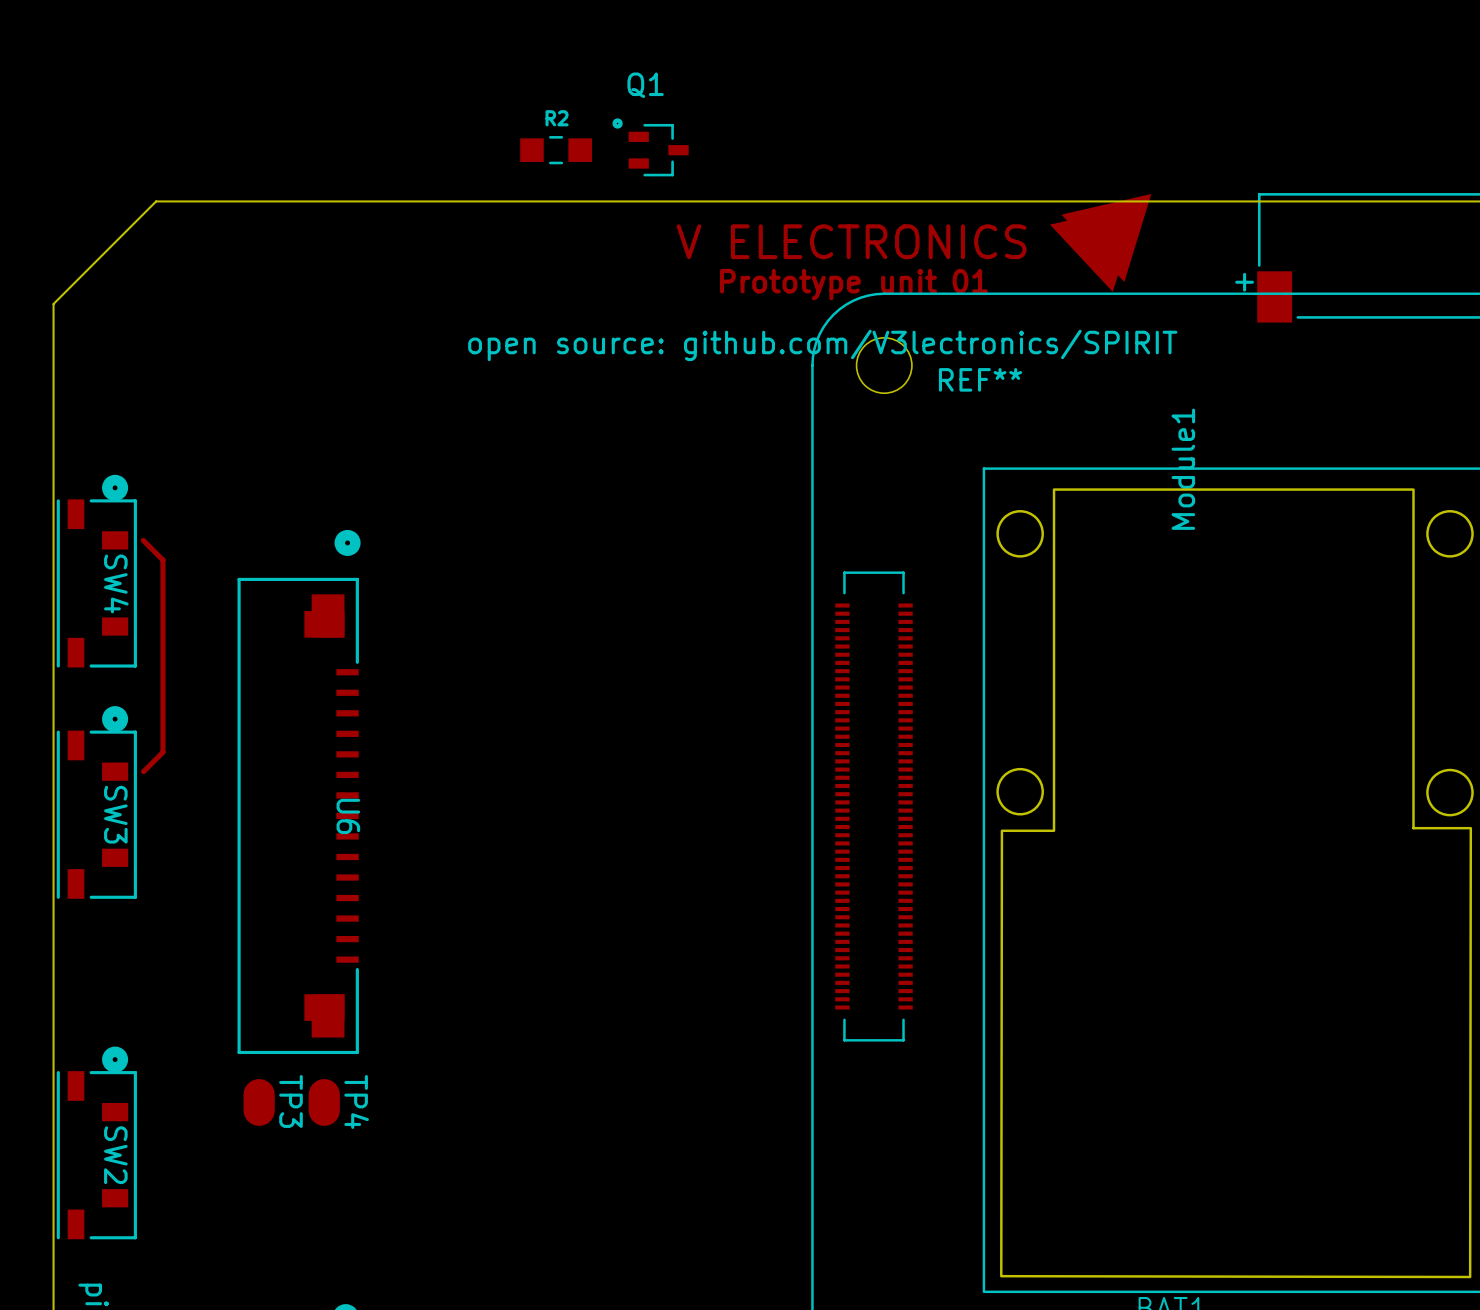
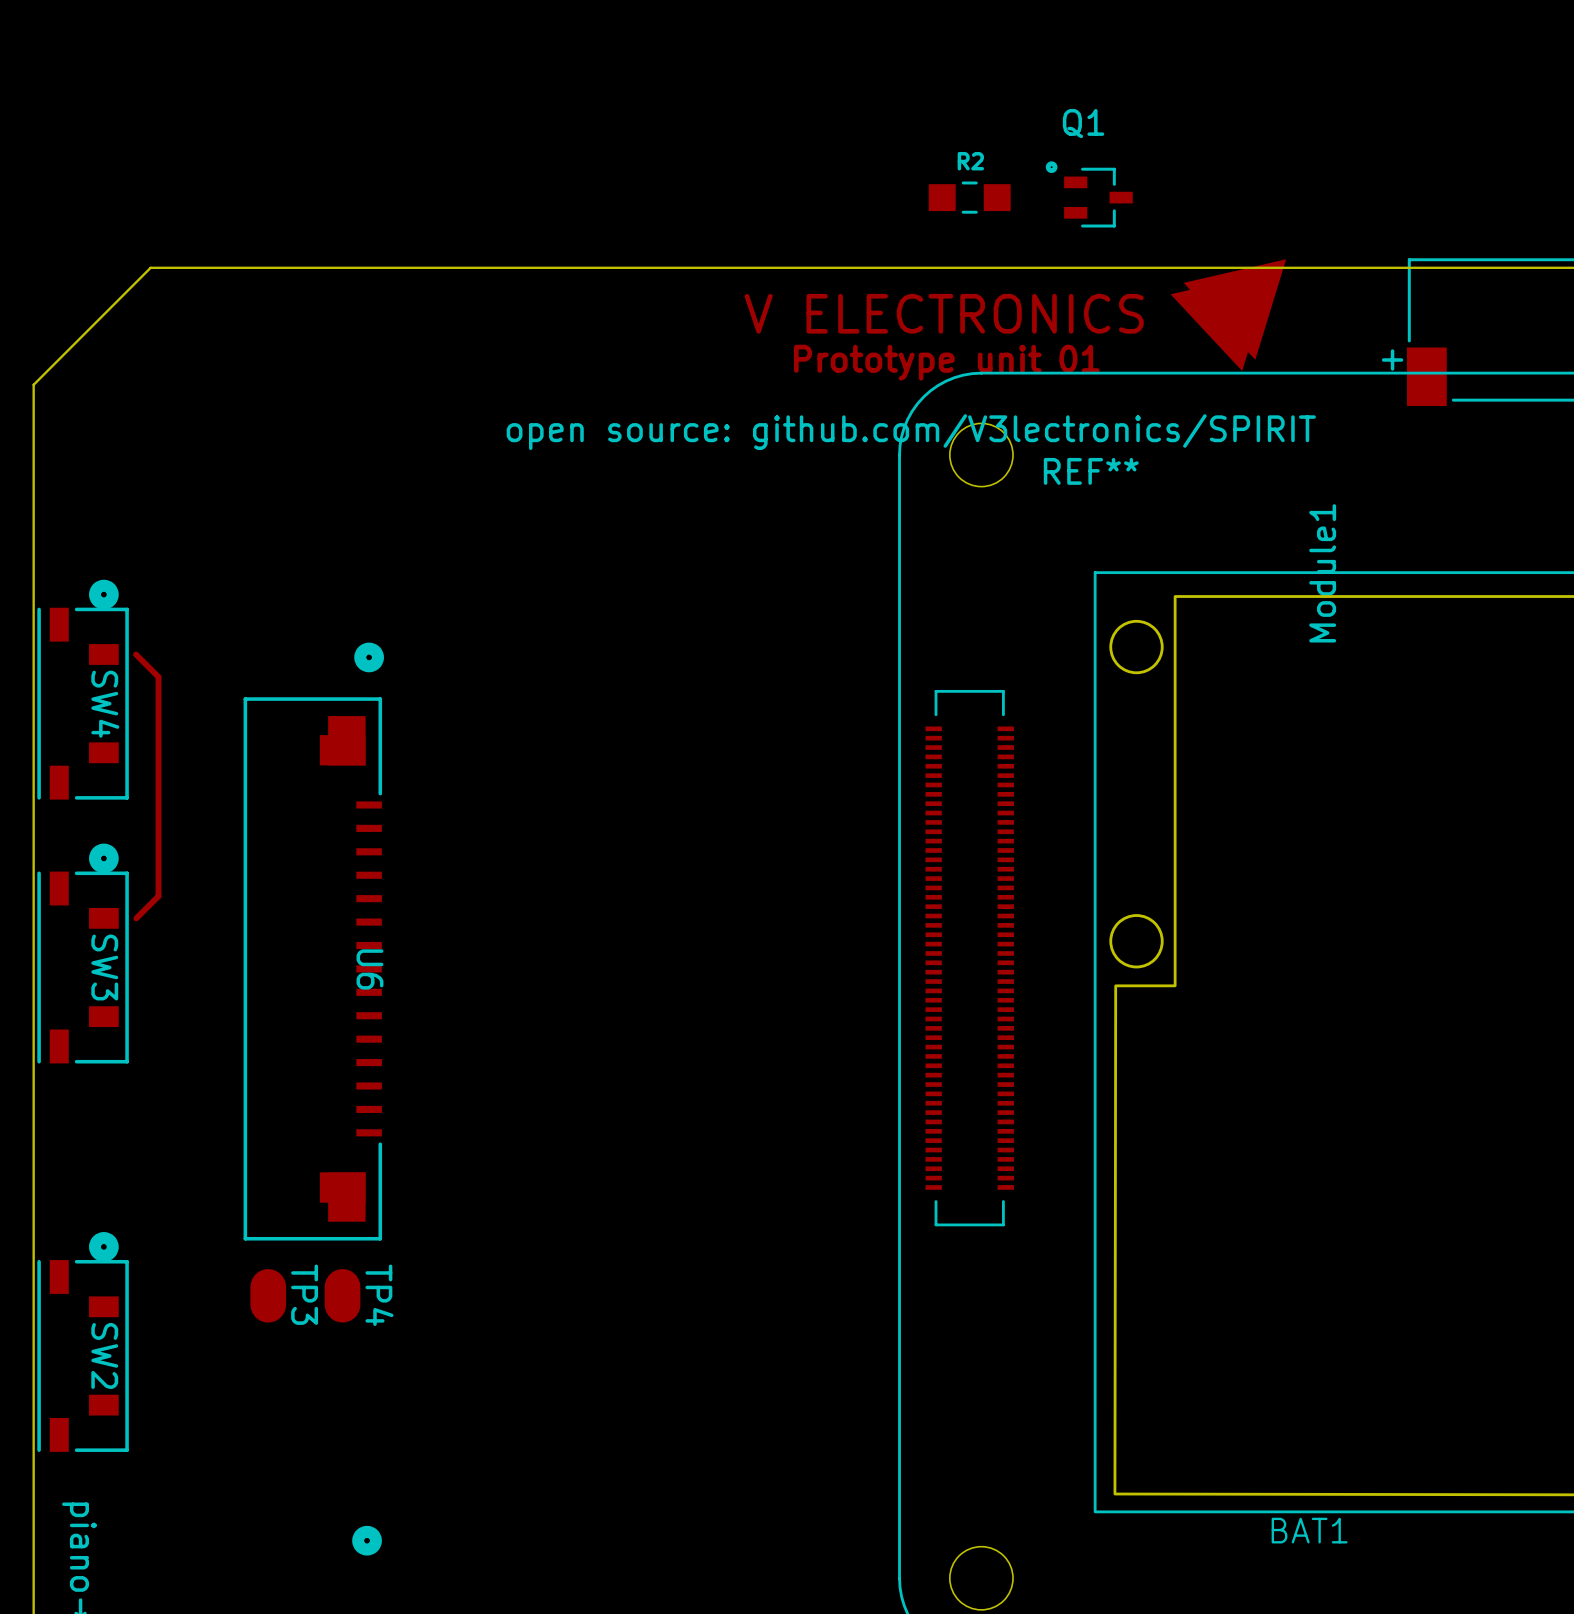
Q1 position: (650, 147) -> (1089, 194)
R2 position: (556, 150) -> (969, 197)

